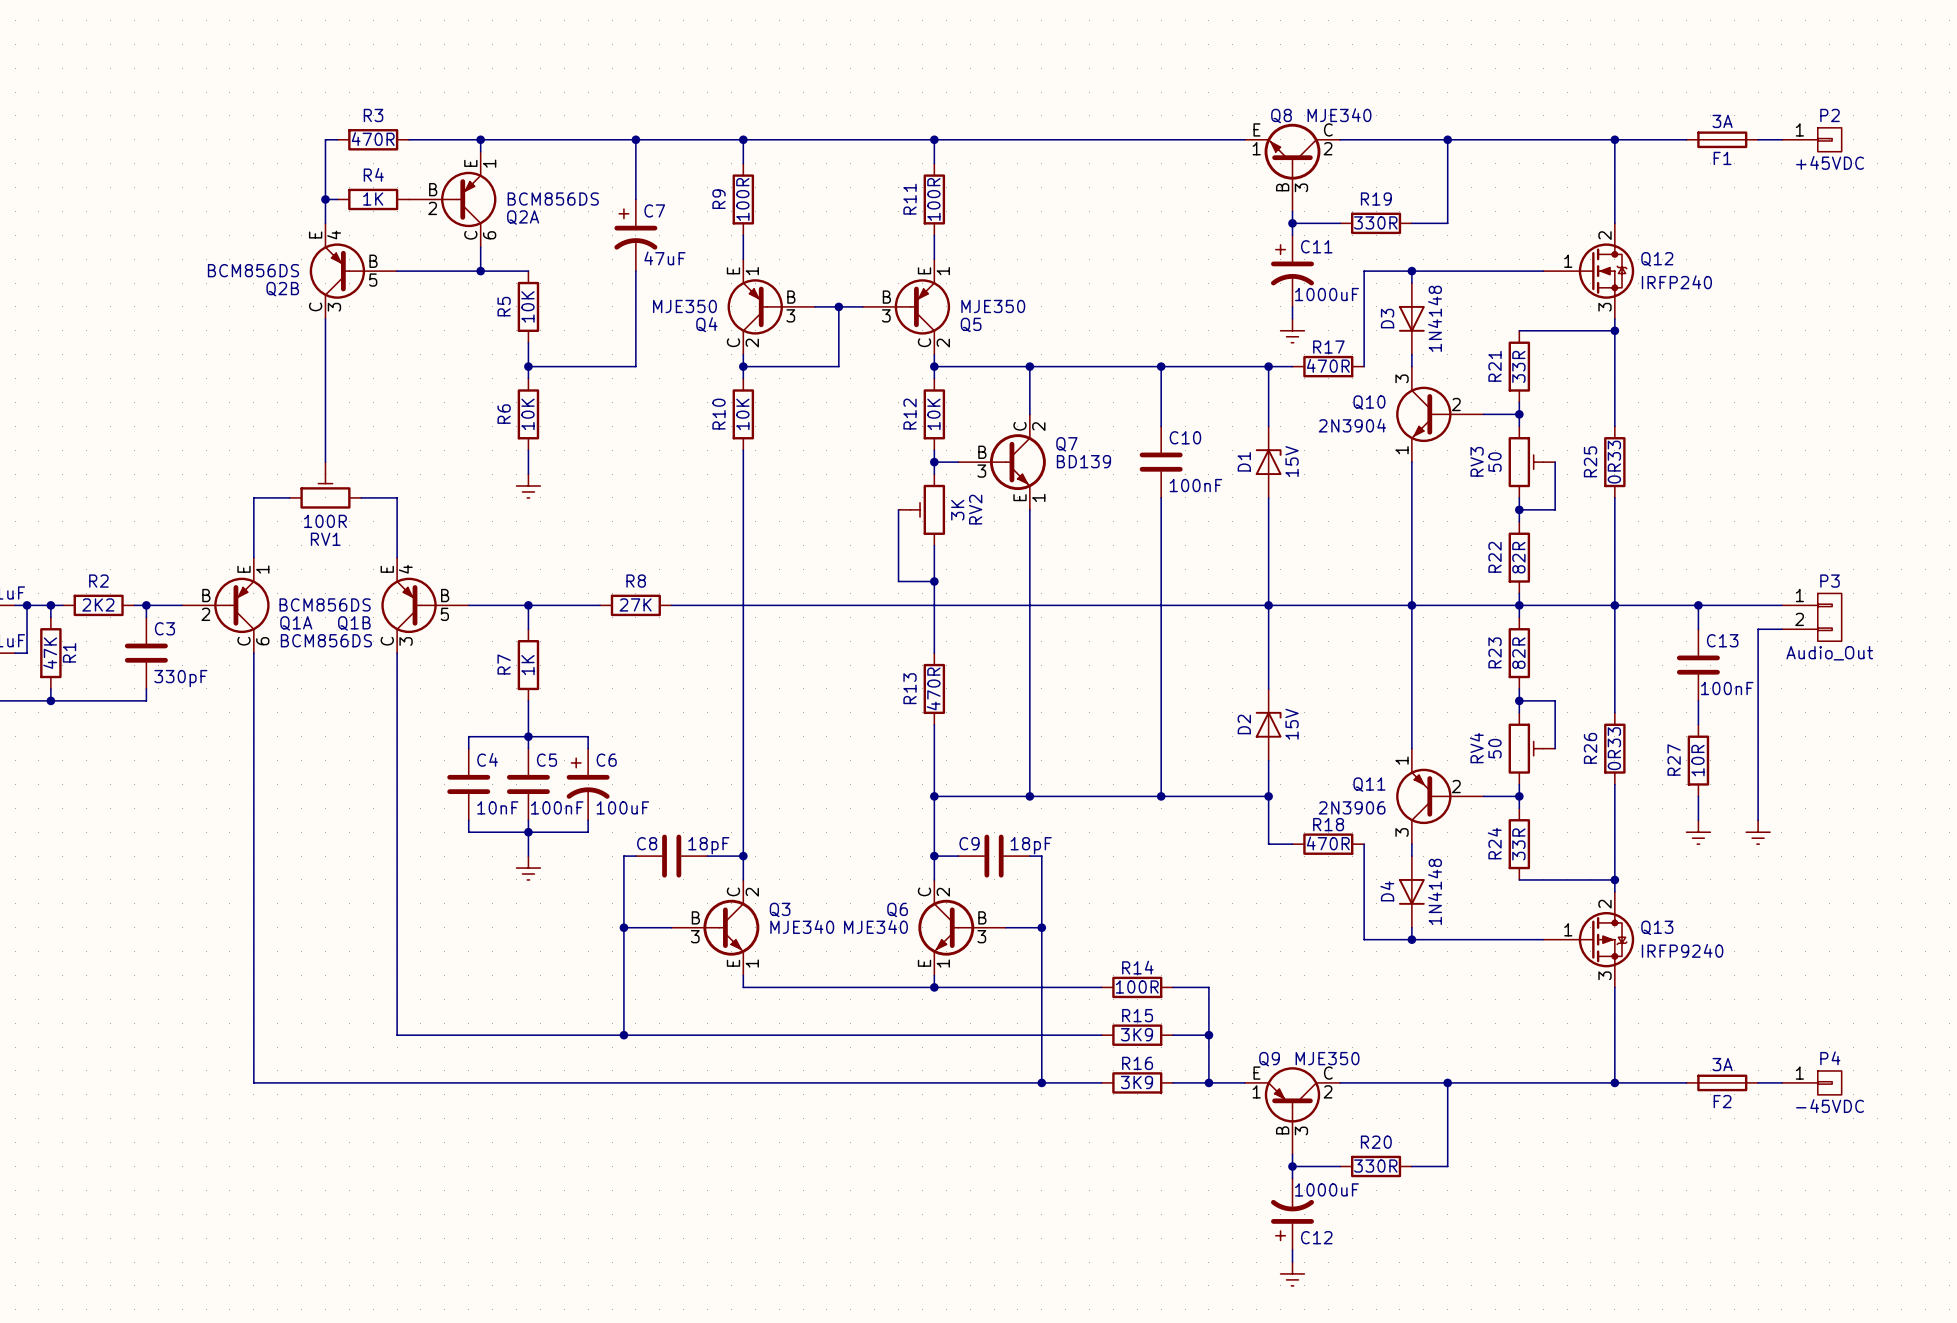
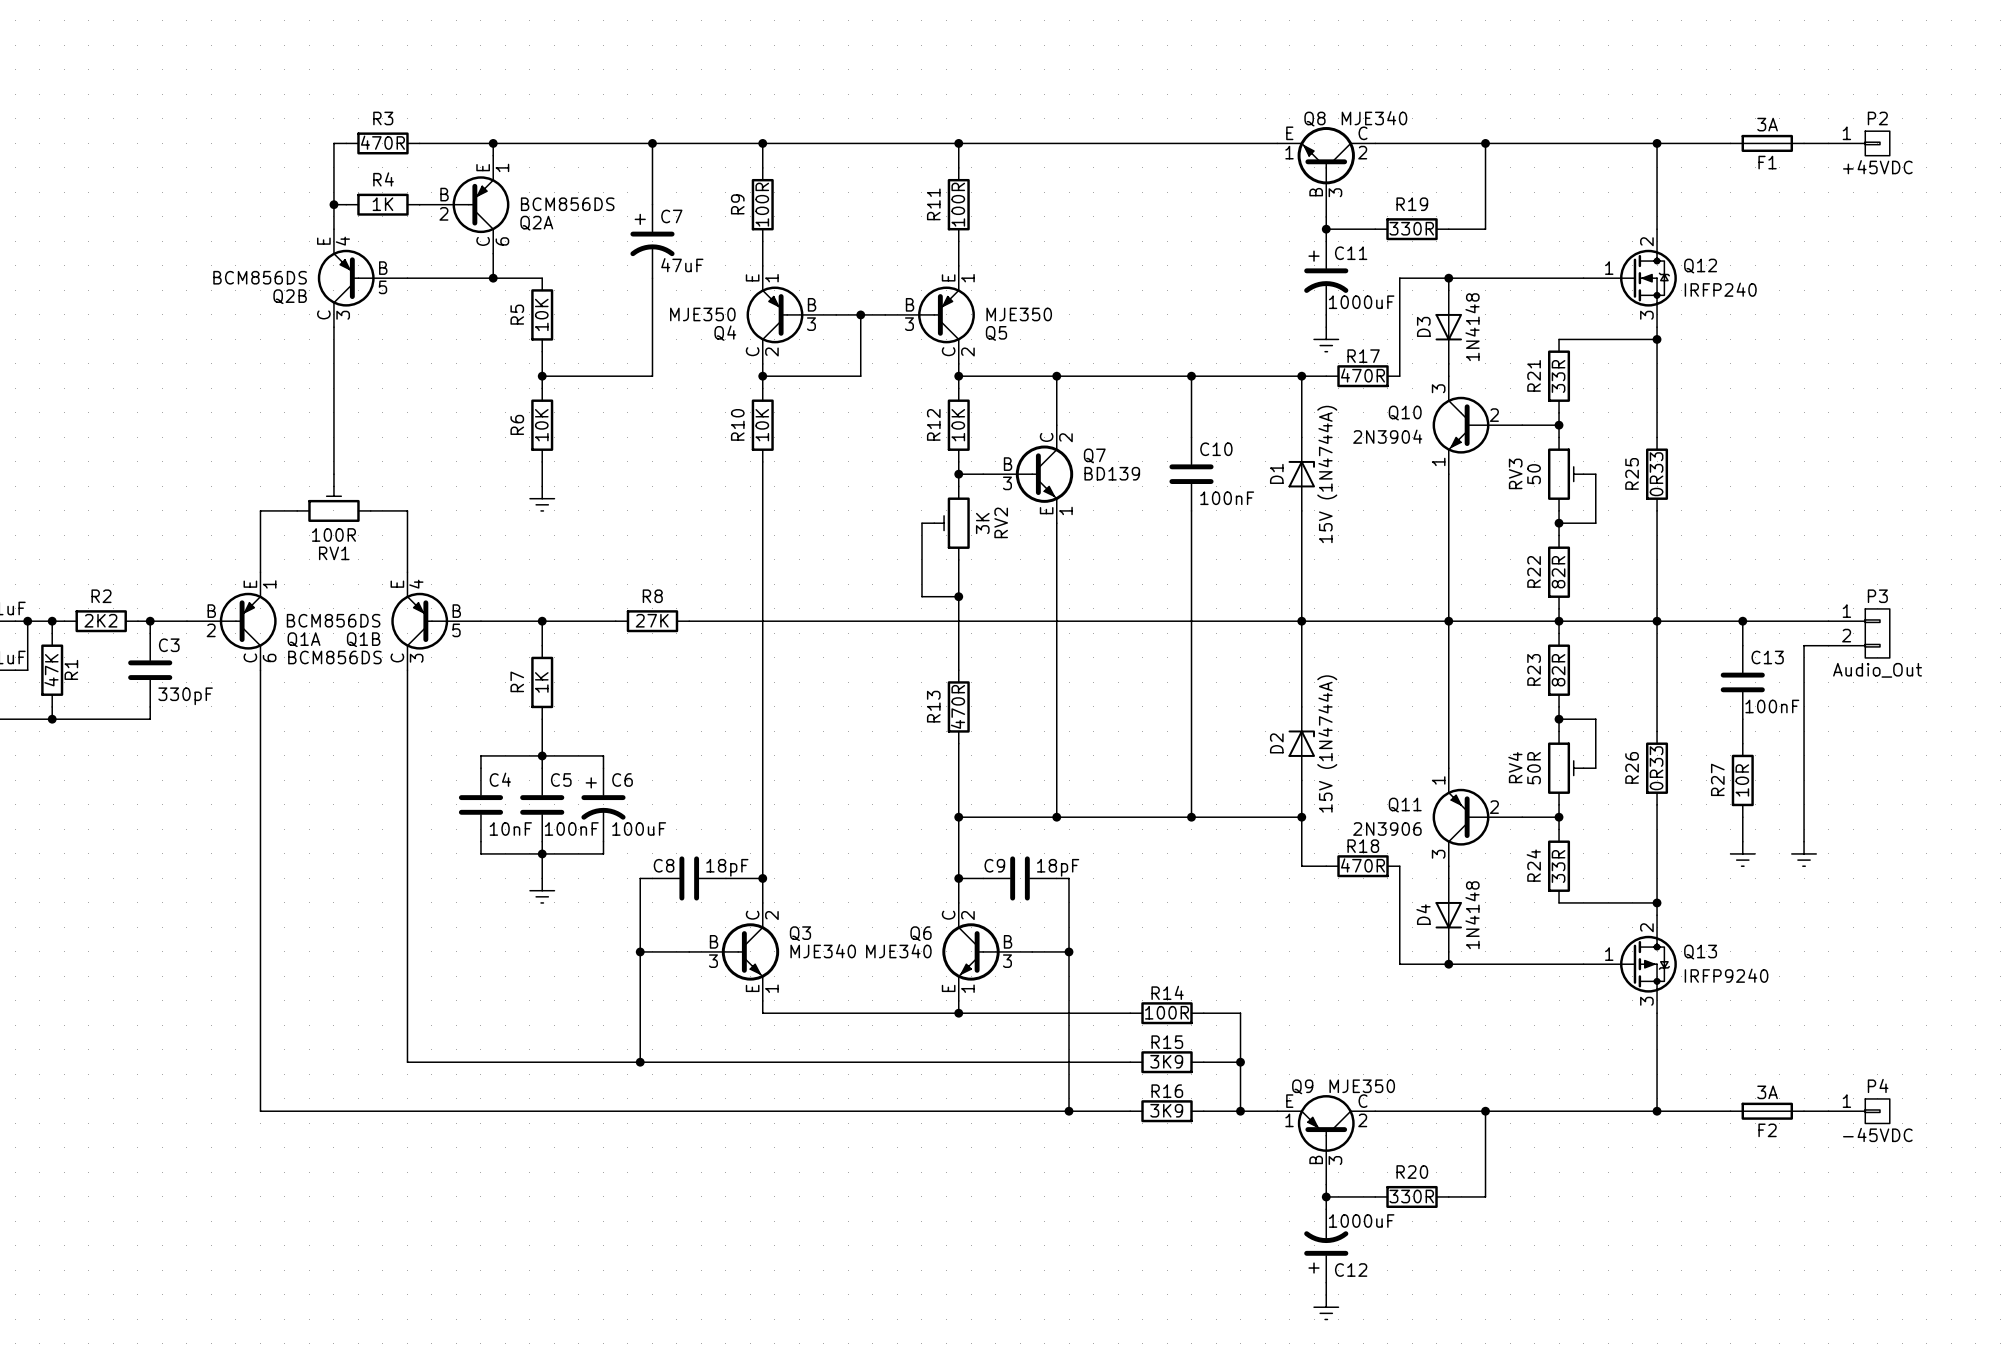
D1 value: 15V (1292, 461) -> 15V (1N4744A) (1327, 474)
D2 value: 15V (1292, 724) -> 15V (1N4744A) (1327, 743)
RV4 value: 50 (1495, 748) -> 50R (1534, 768)

